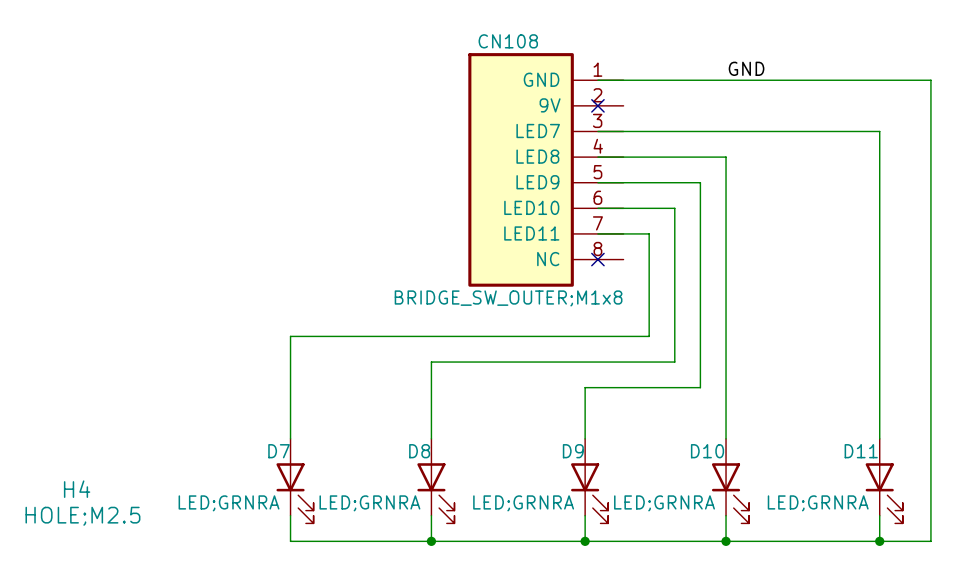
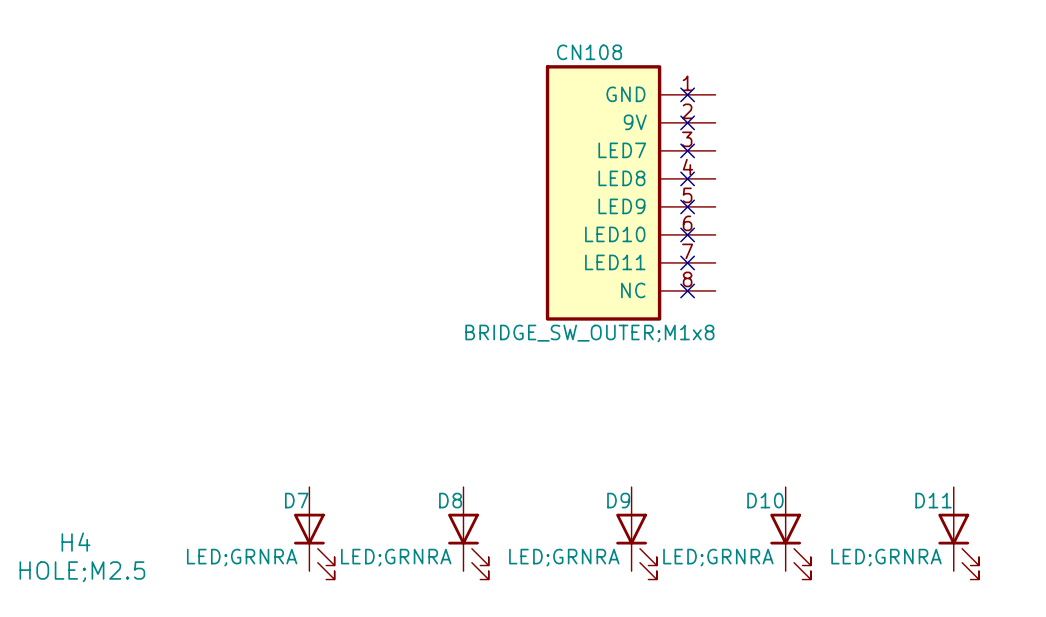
label: GND (746, 68) -> none
wire: (597, 80) (930, 80) (930, 541) (290, 541) (290, 515) -> none
no-connect mark: none -> (687, 94)
no-connect mark: (597, 105) -> none
no-connect mark: none -> (687, 122)
wire: (597, 131) (879, 131) (879, 438) -> none
no-connect mark: none -> (687, 150)
wire: (597, 157) (726, 157) (726, 438) -> none
no-connect mark: none -> (687, 178)
CN108 position: (545, 169) -> (630, 192)
wire: (597, 182) (700, 182) (700, 387) (585, 387) (585, 438) -> none
no-connect mark: none -> (687, 206)
wire: (597, 208) (674, 208) (674, 362) (431, 362) (431, 438) -> none
no-connect mark: none -> (687, 234)
wire: (597, 233) (649, 233) (649, 336) (290, 336) (290, 438) -> none
no-connect mark: none -> (687, 262)
no-connect mark: (597, 259) -> none
no-connect mark: none -> (687, 290)
wire: (431, 515) (431, 541) -> none
wire: (585, 515) (585, 541) -> none
wire: (726, 515) (726, 541) -> none
wire: (879, 515) (879, 541) -> none
junction: (431, 541) -> none
junction: (585, 541) -> none
junction: (726, 541) -> none
junction: (879, 541) -> none

